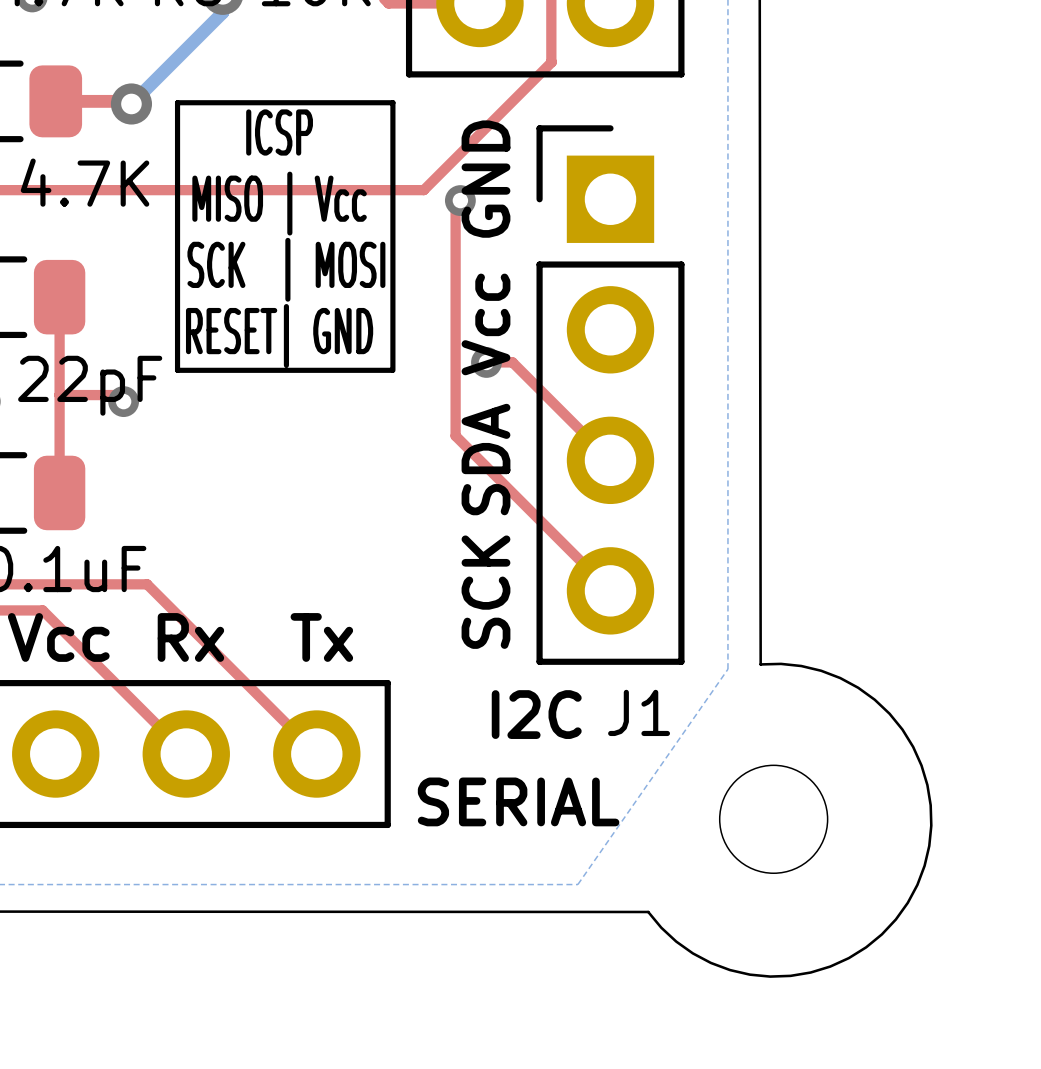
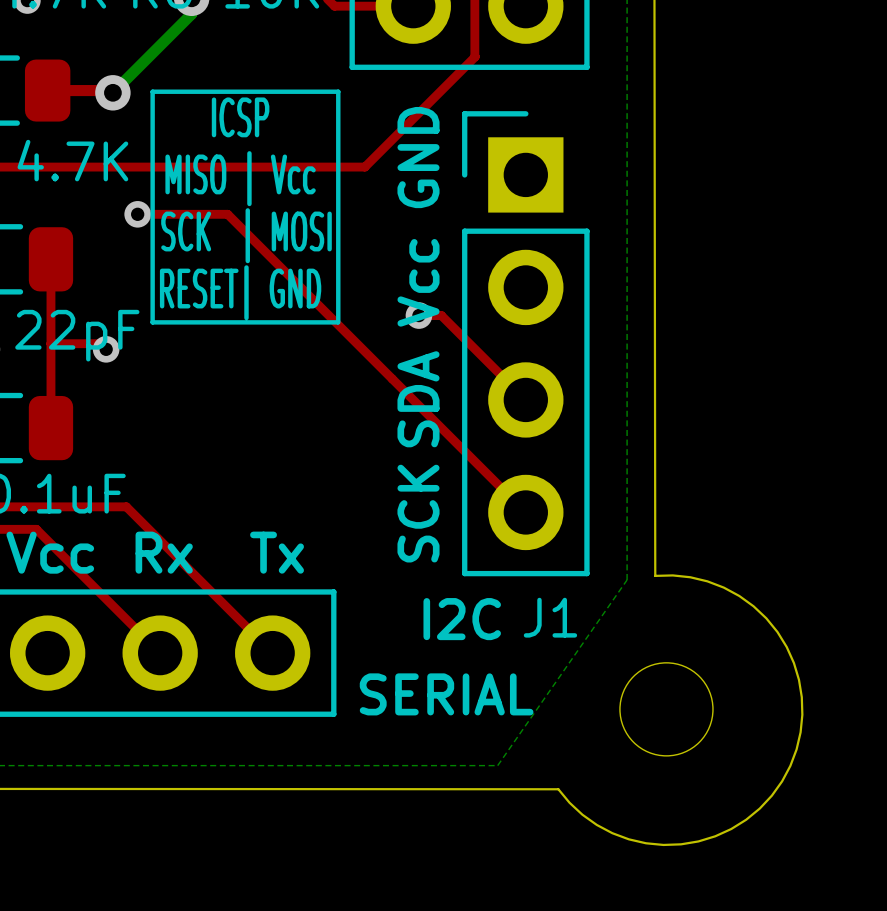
top track: (460, 200) (455, 205) (455, 435) -> (137, 214) (227, 214) (392, 378)
via: (460, 200) -> none
via: none -> (137, 214)

